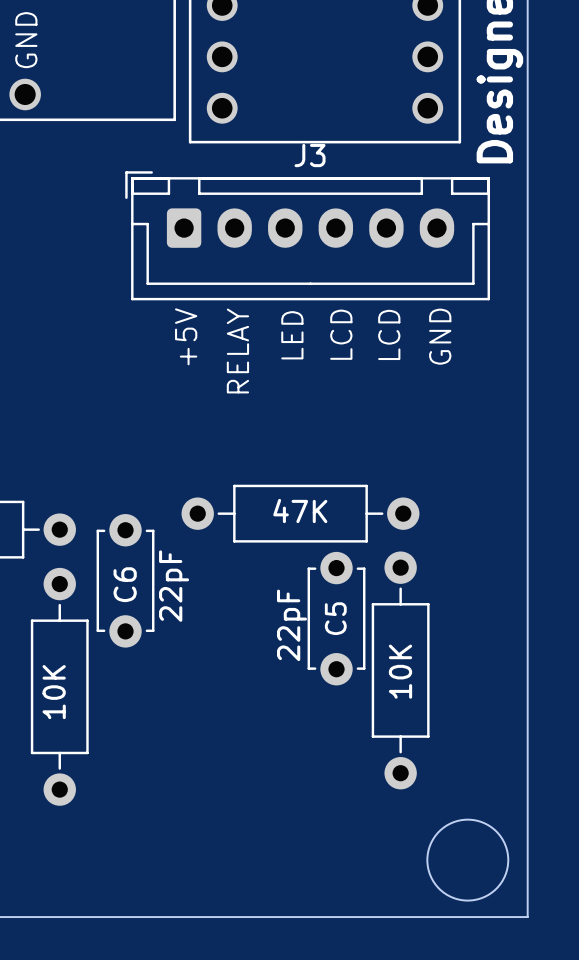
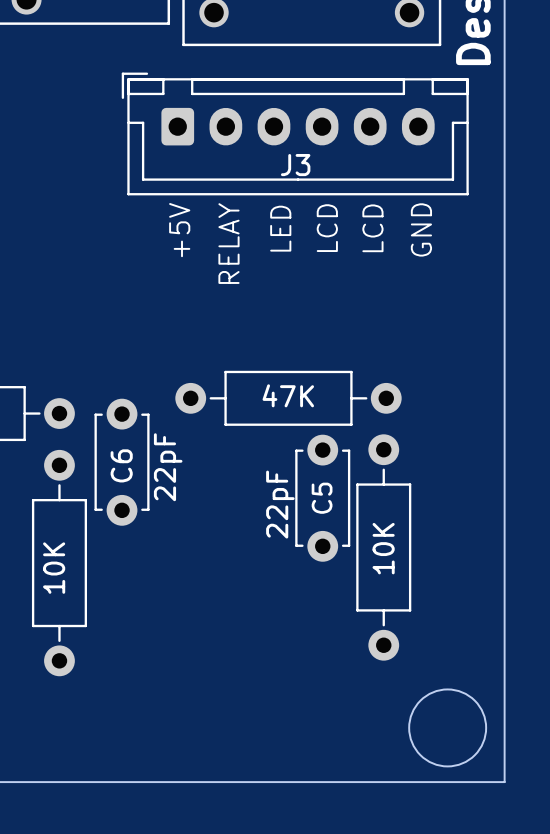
J3 name position: J3 (310, 155) -> J3 (295, 165)

